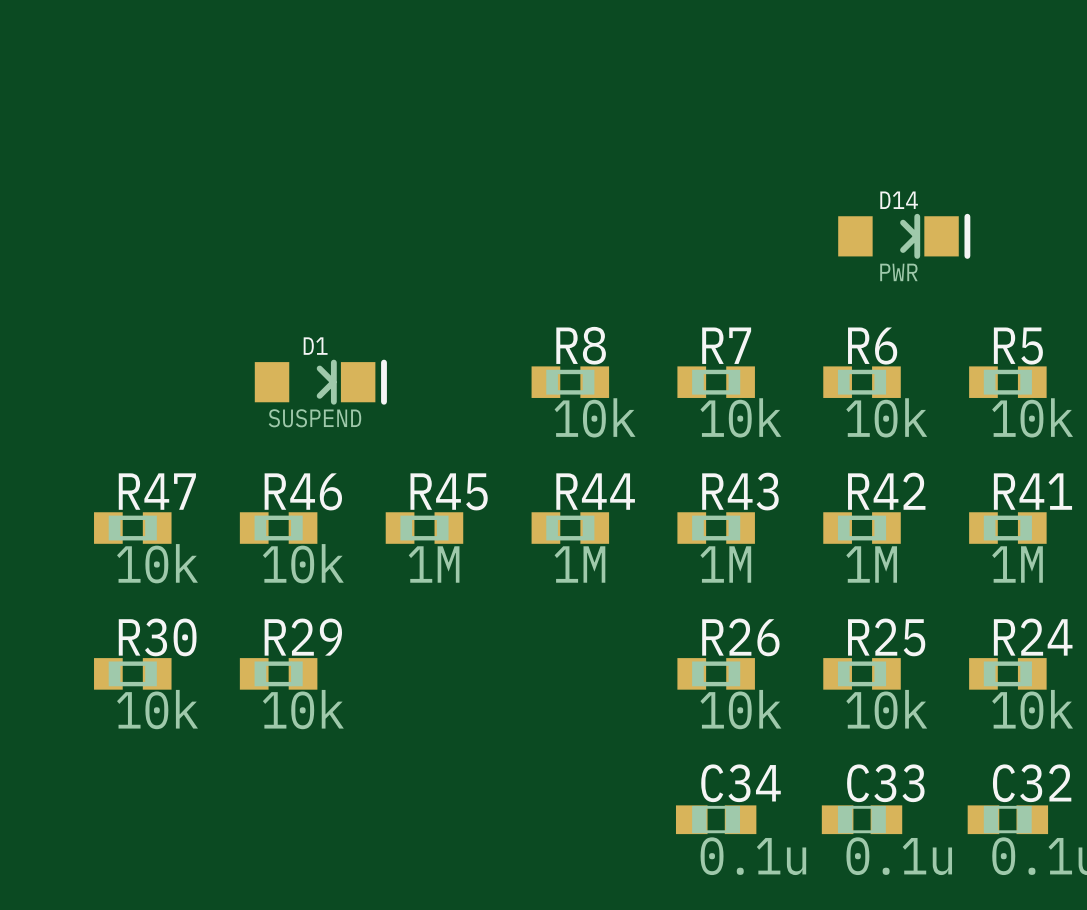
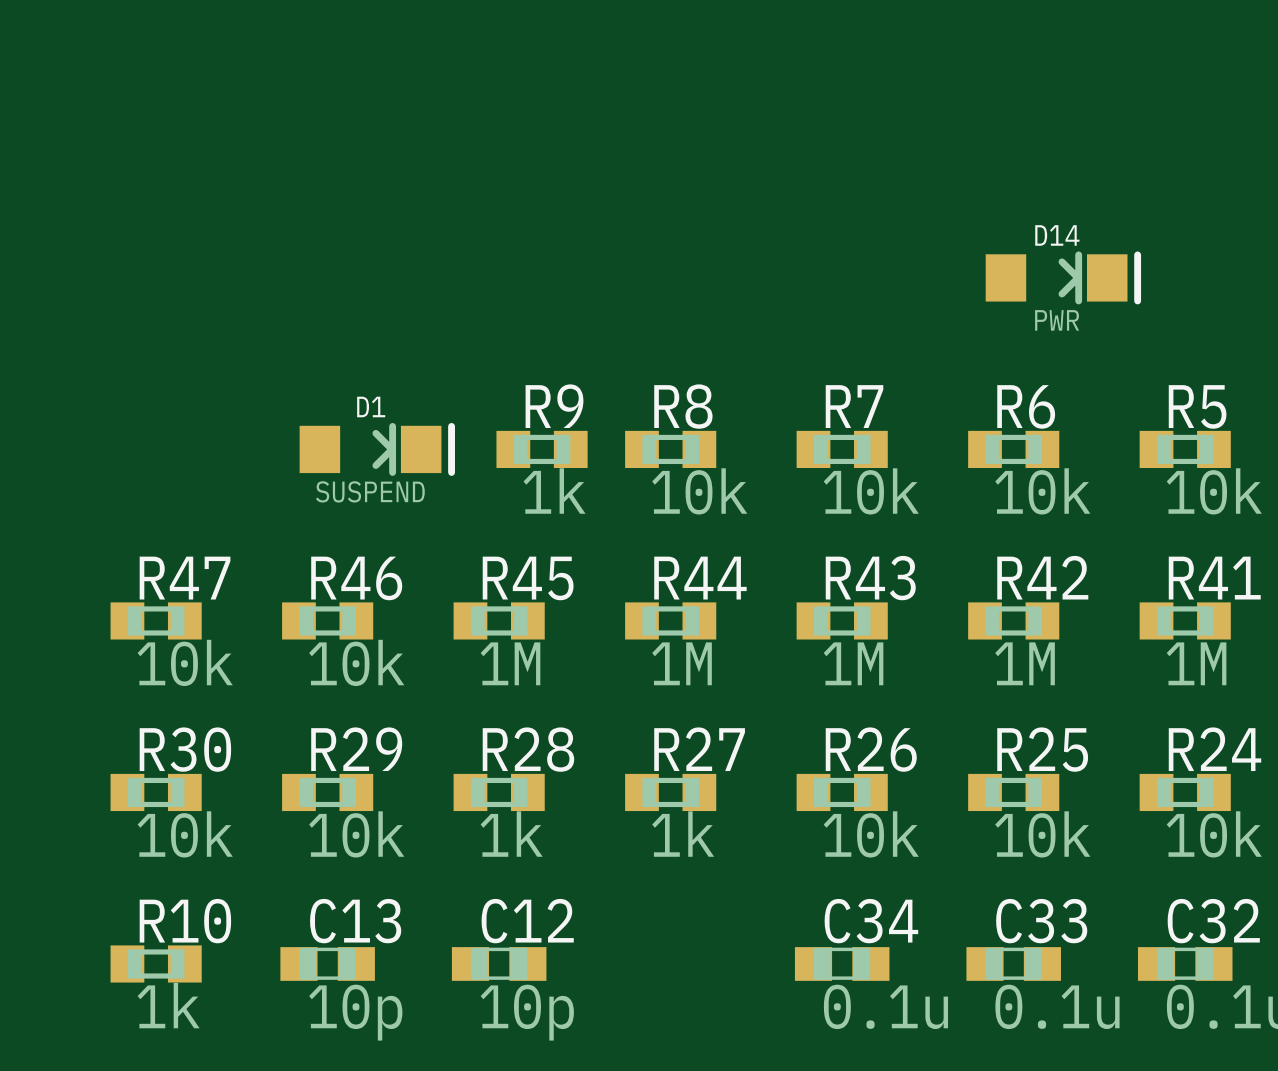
R9: none -> 1k (542, 449)
R28: none -> 1k (499, 792)
R27: none -> 1k (670, 792)
R10: none -> 1k (156, 963)
C13: none -> 10p (327, 963)
C12: none -> 10p (499, 963)

